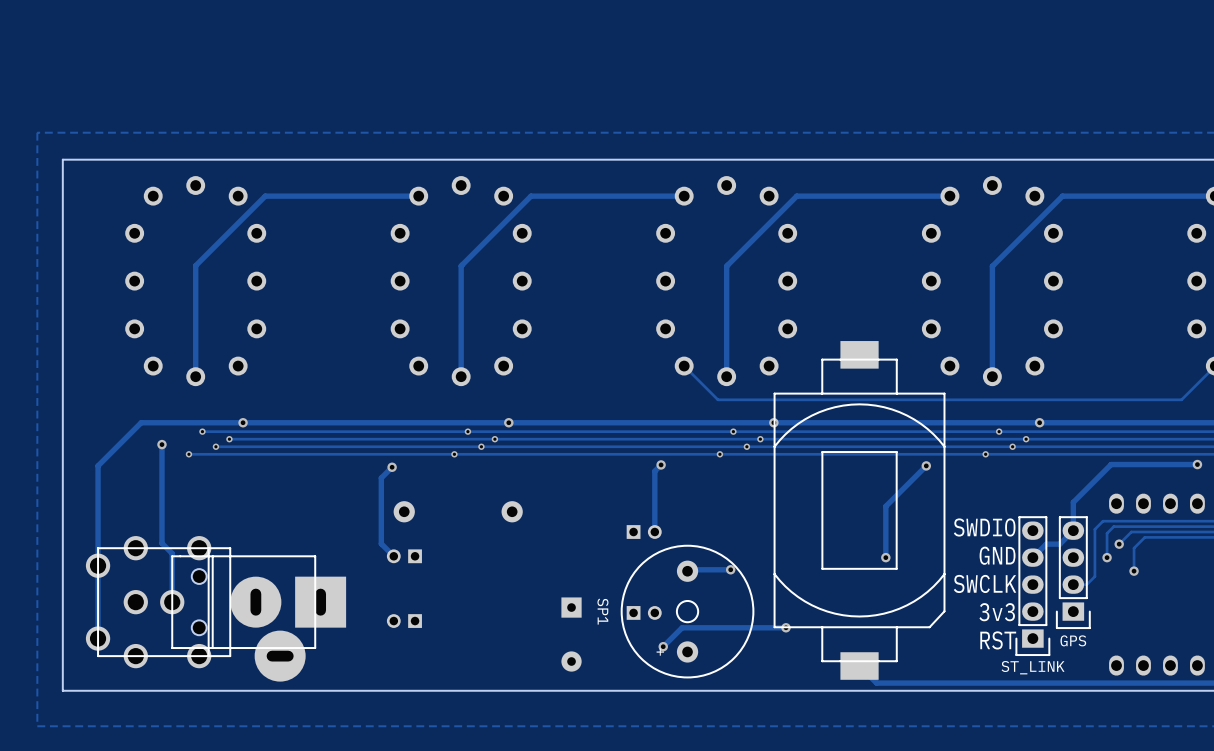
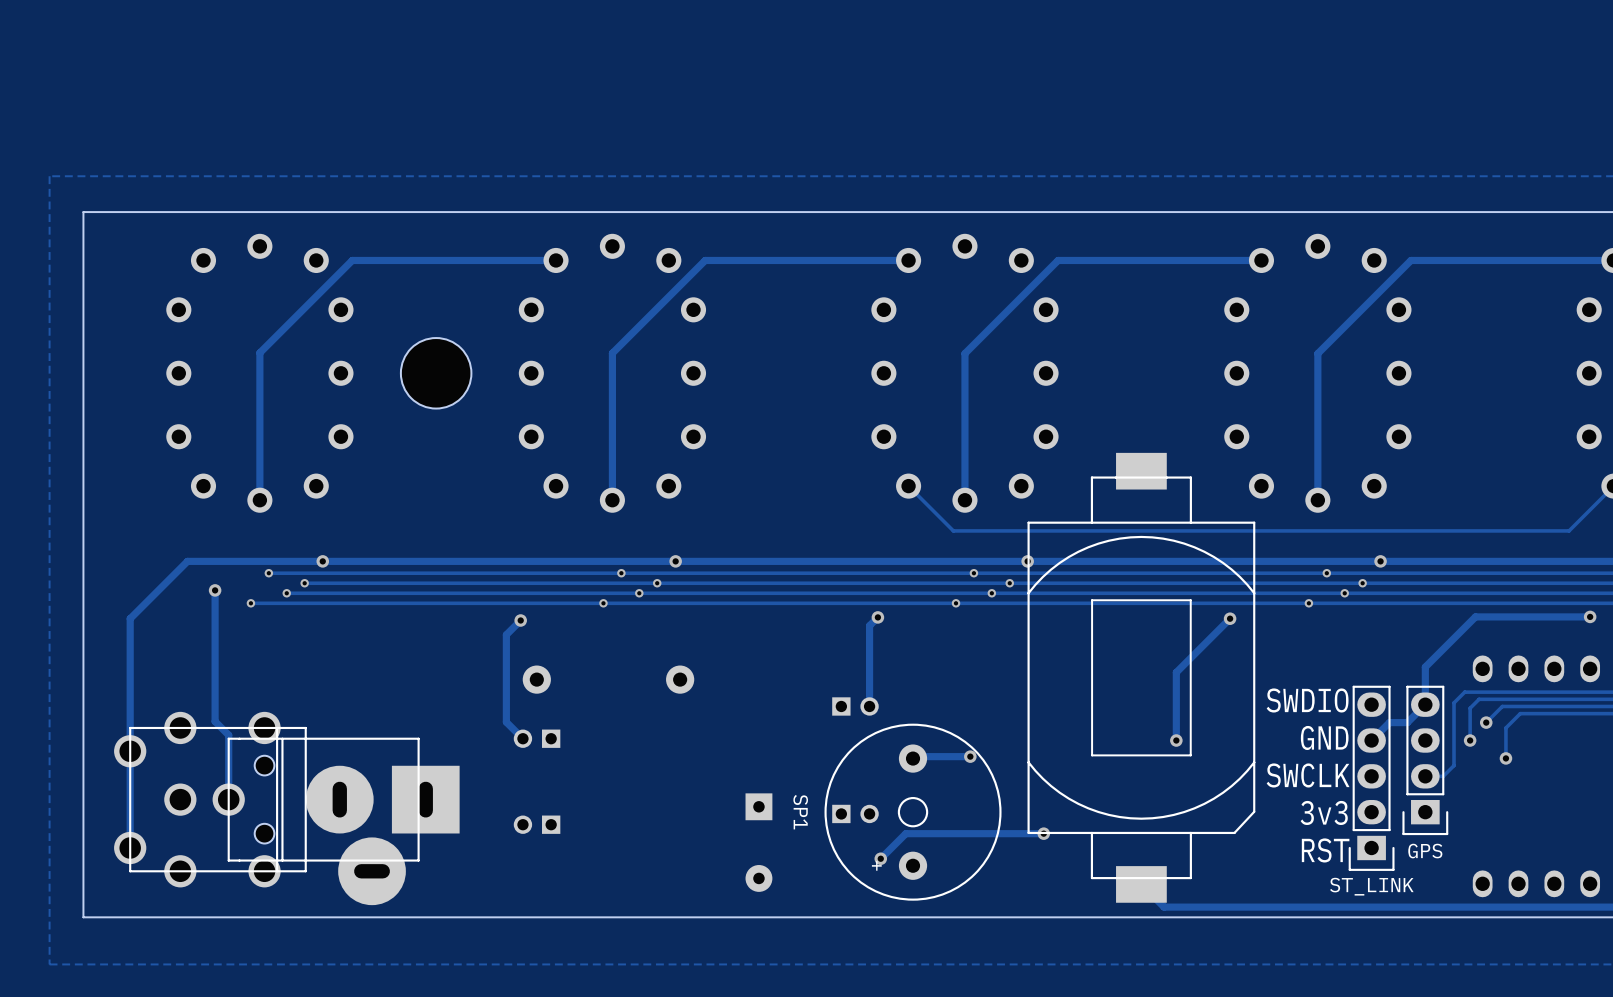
part: none -> (436, 373)

